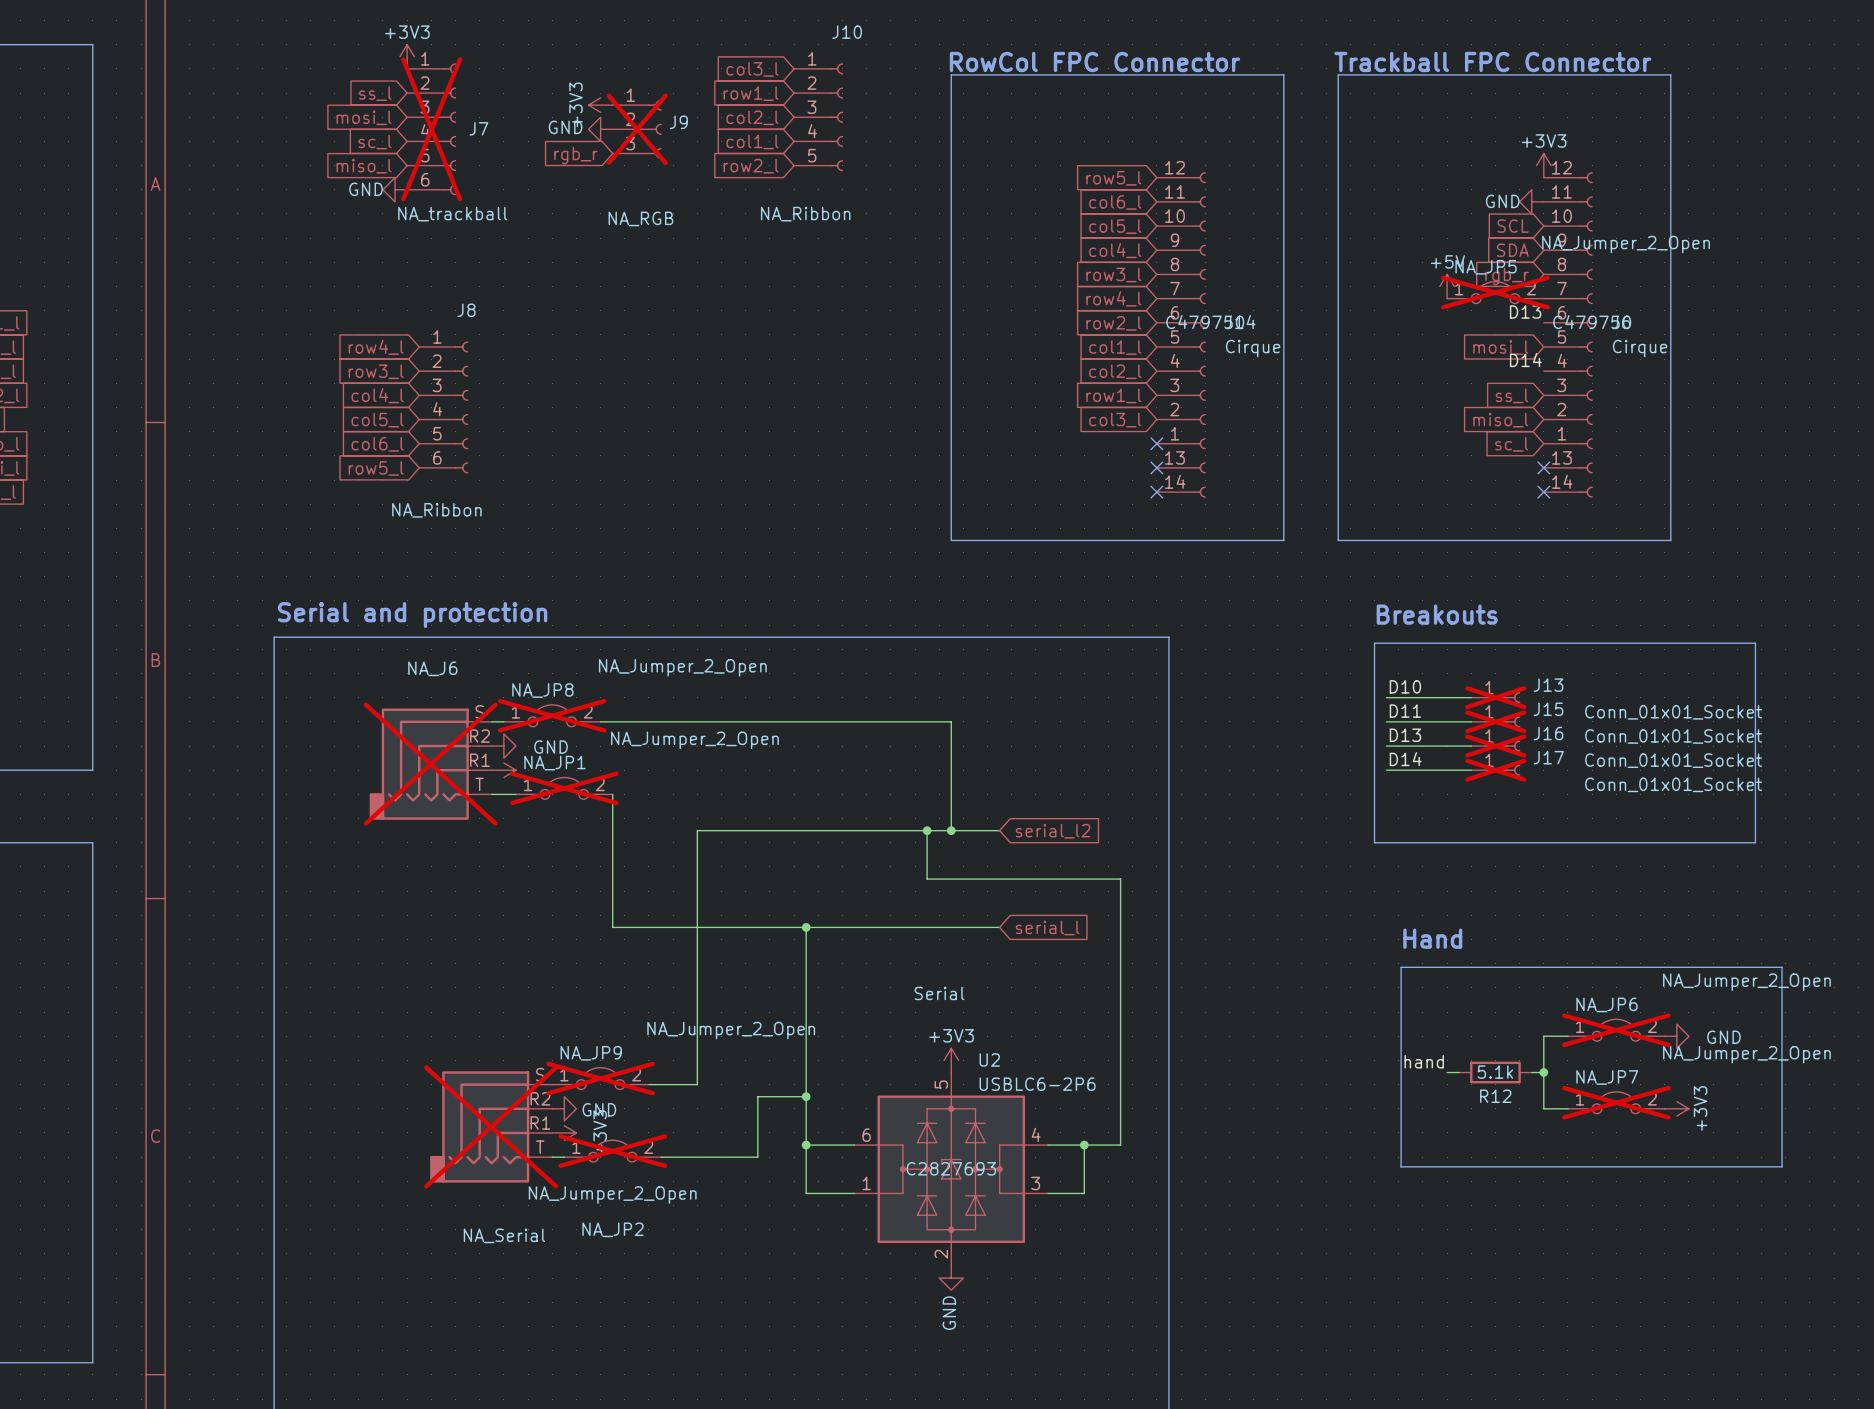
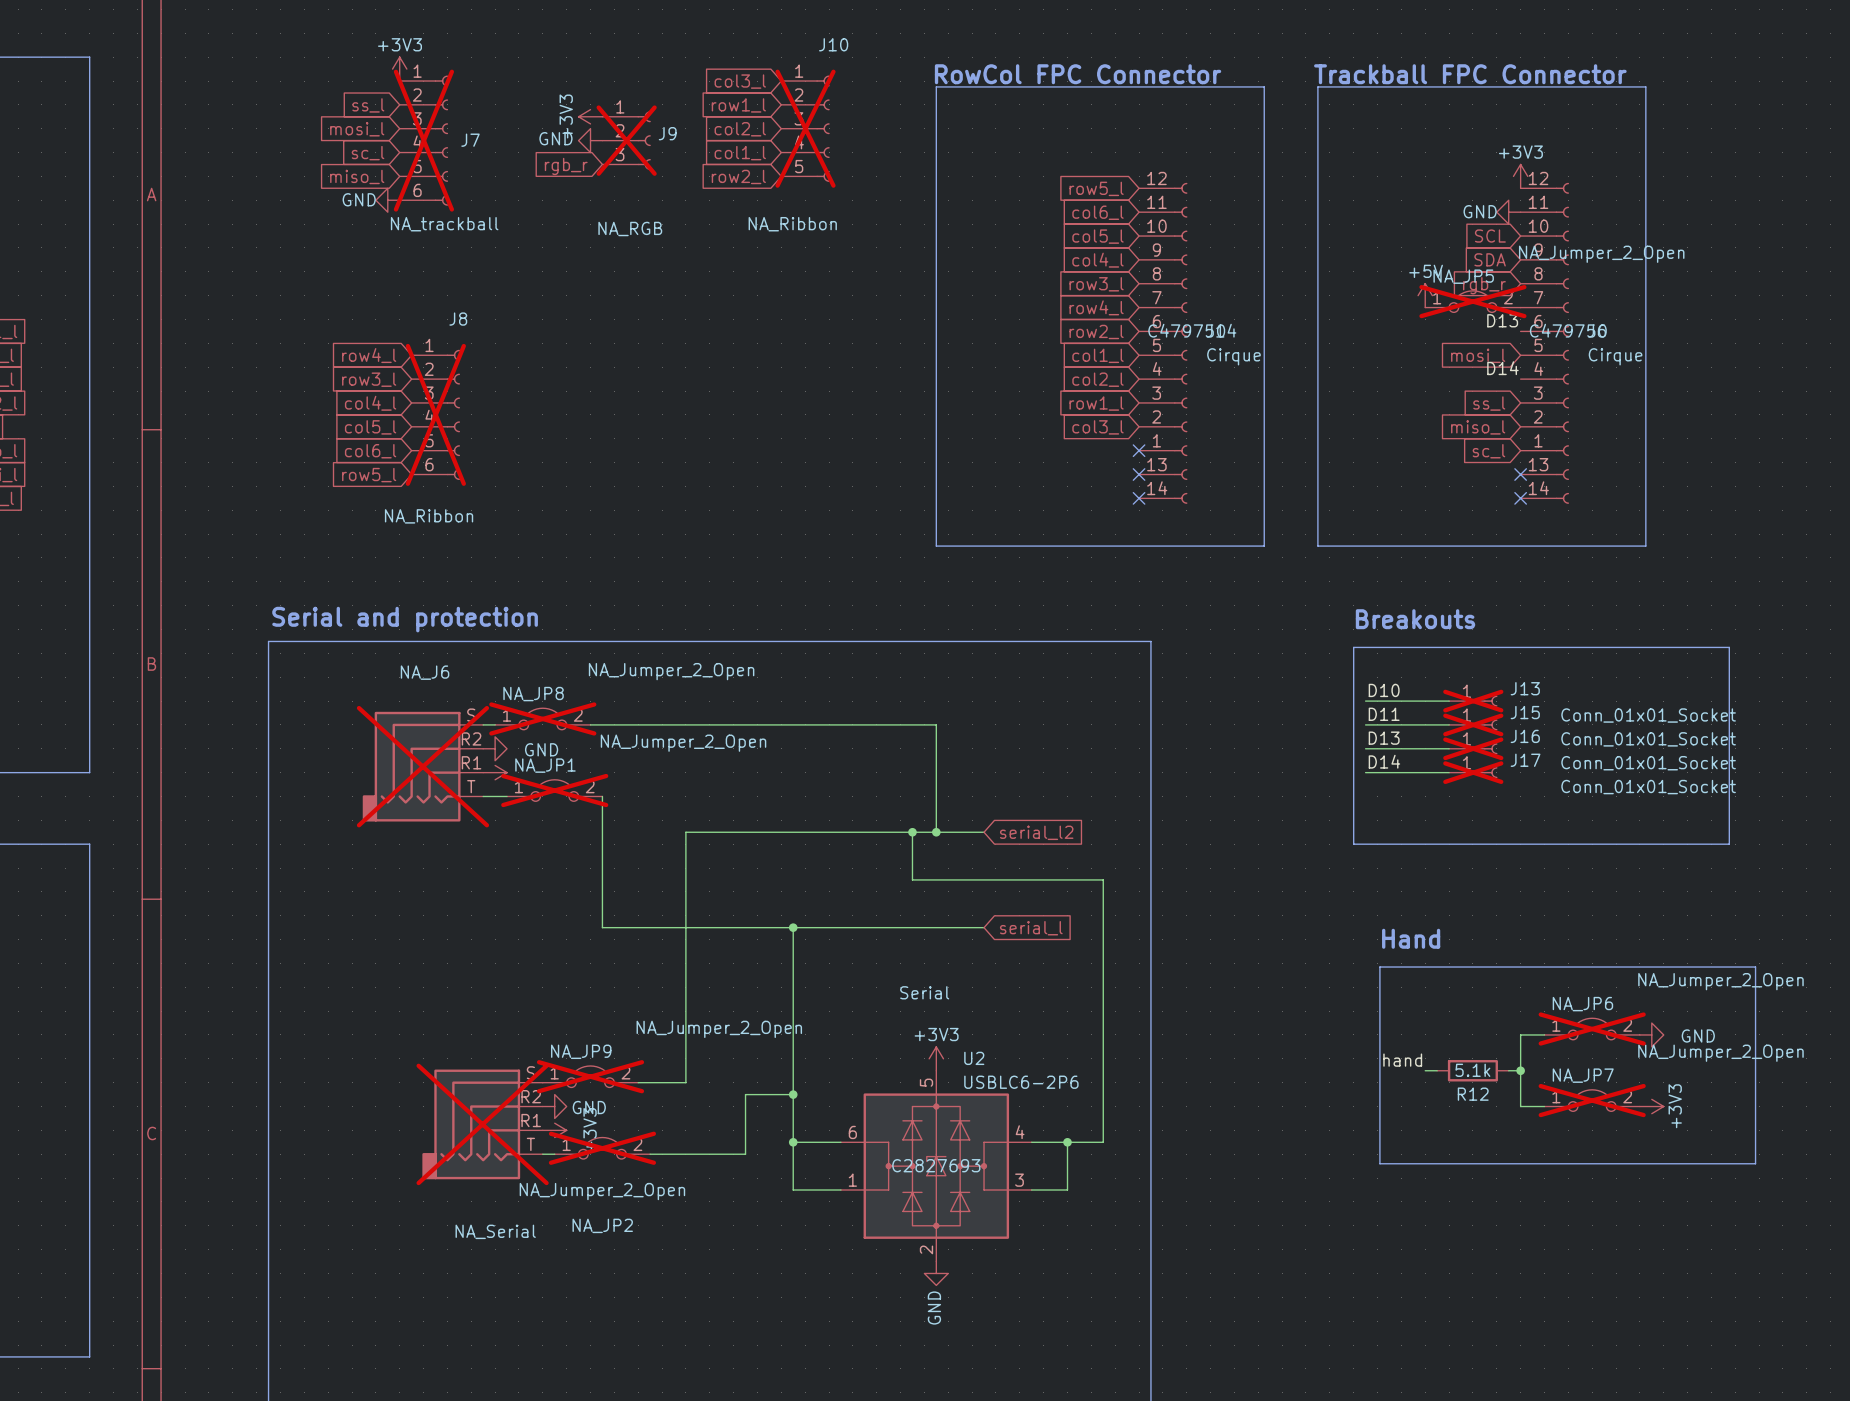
J10 do-not-place cross: none -> (805, 128)
J8 do-not-place cross: none -> (435, 414)

